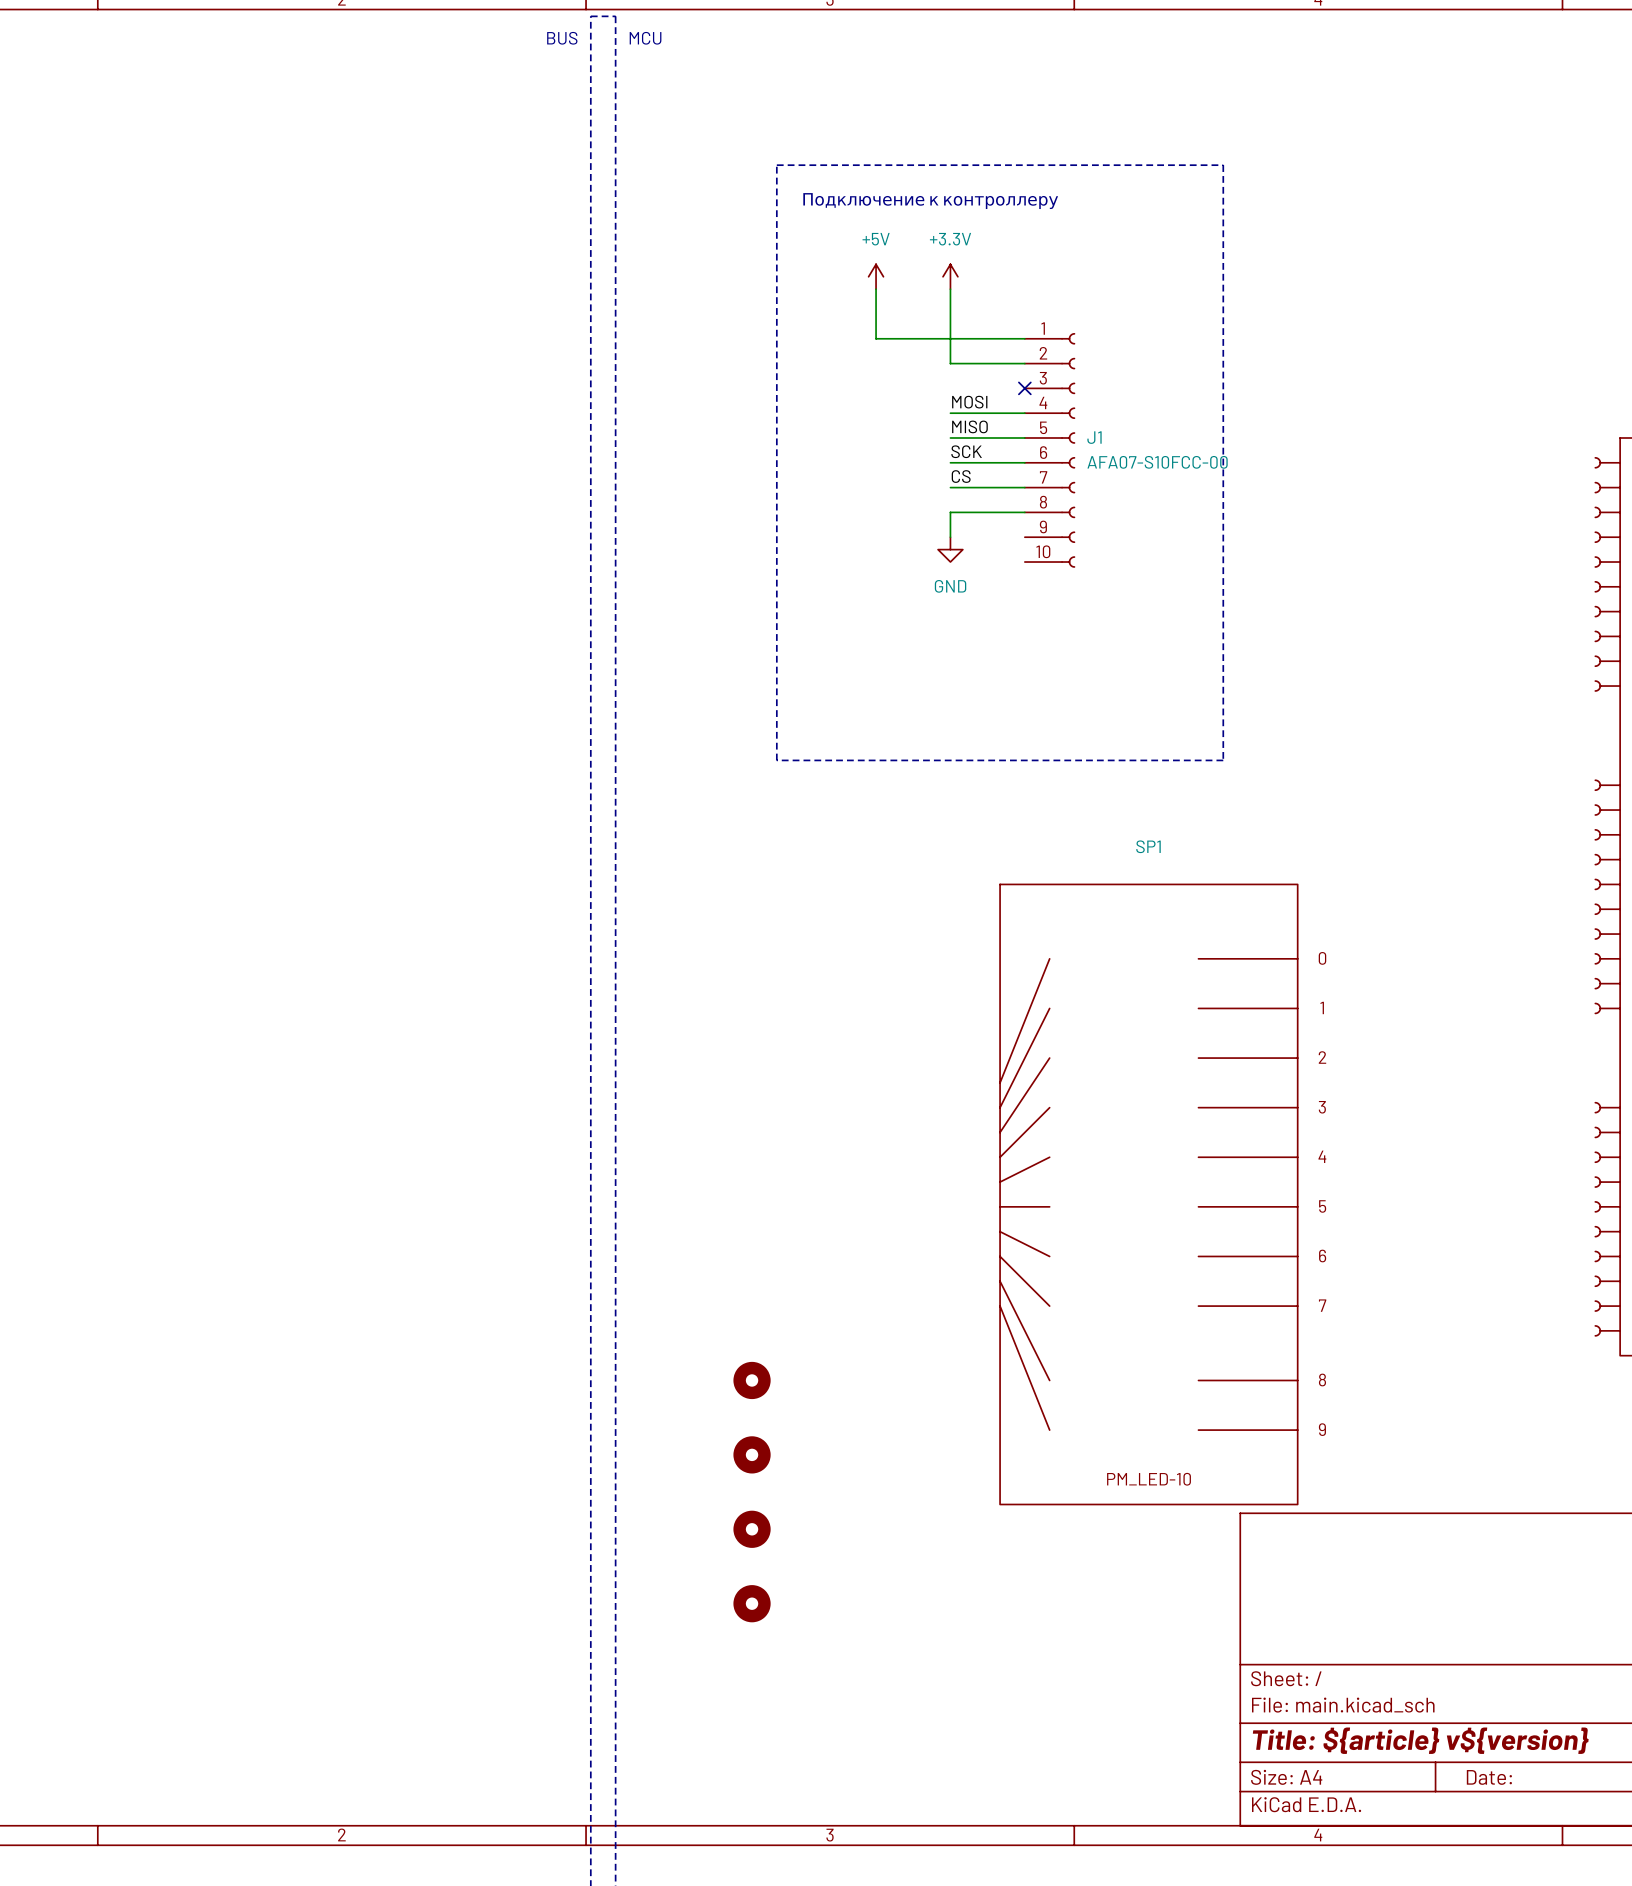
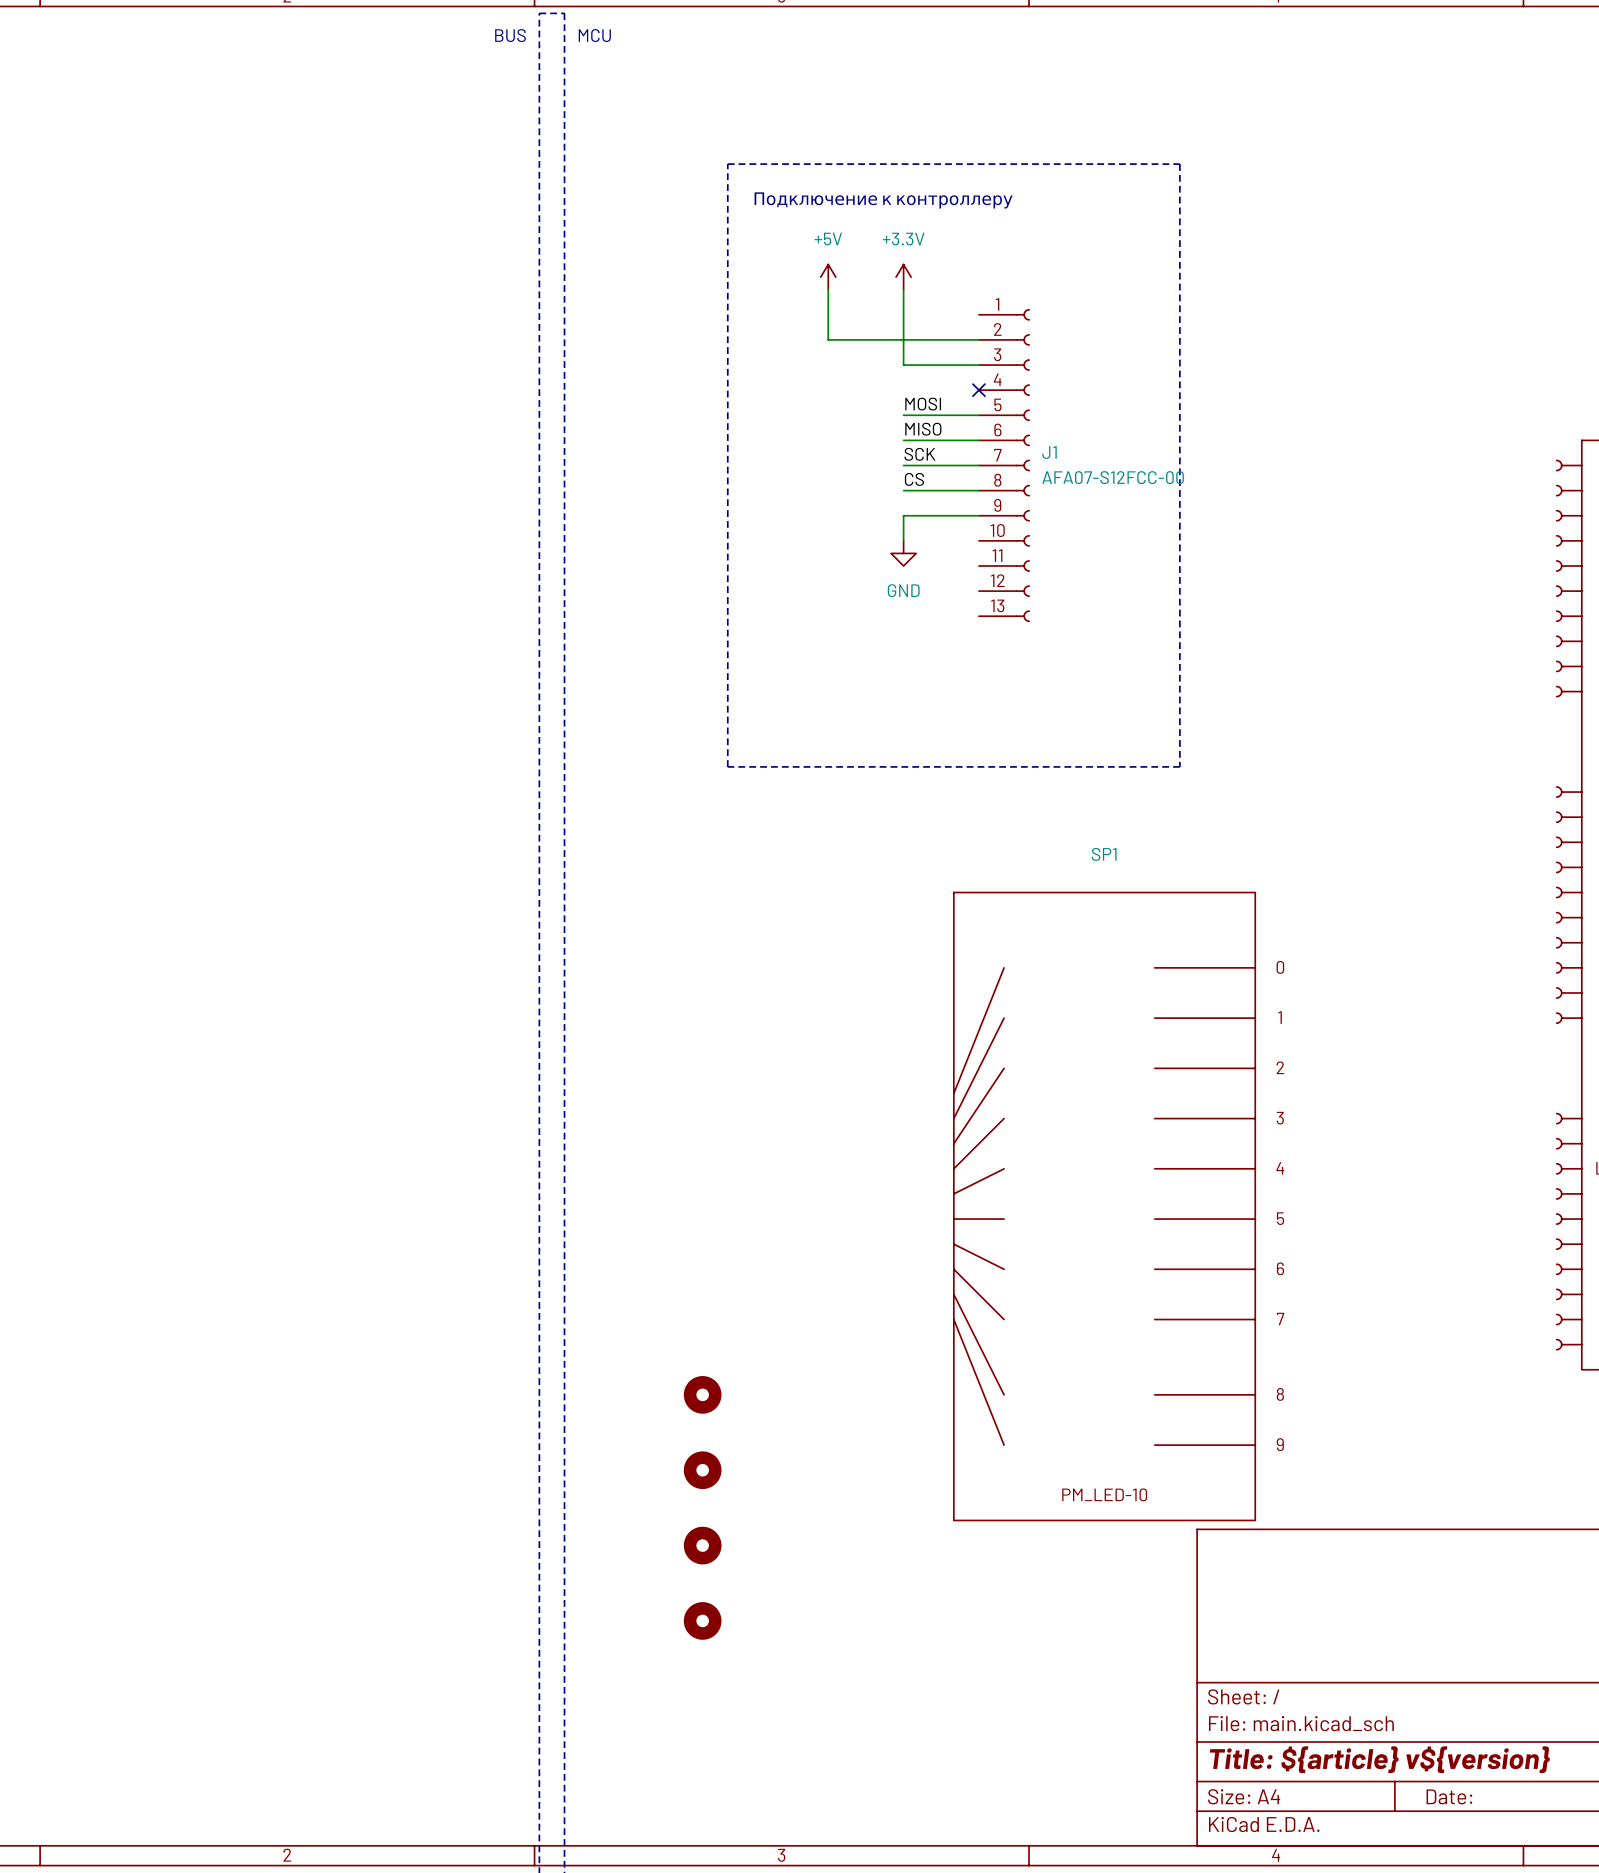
J1 symbol: [1024, 333, 1076, 568] -> [978, 309, 1030, 622]
J1 value: AFA07-S10FCC-00 (1157, 462) -> AFA07-S12FCC-00 (1113, 477)

